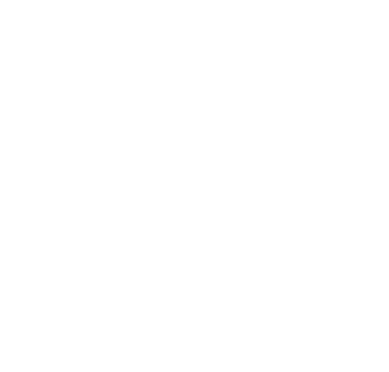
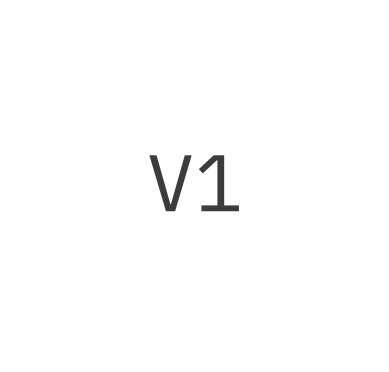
text: none -> V1 (194, 183)

